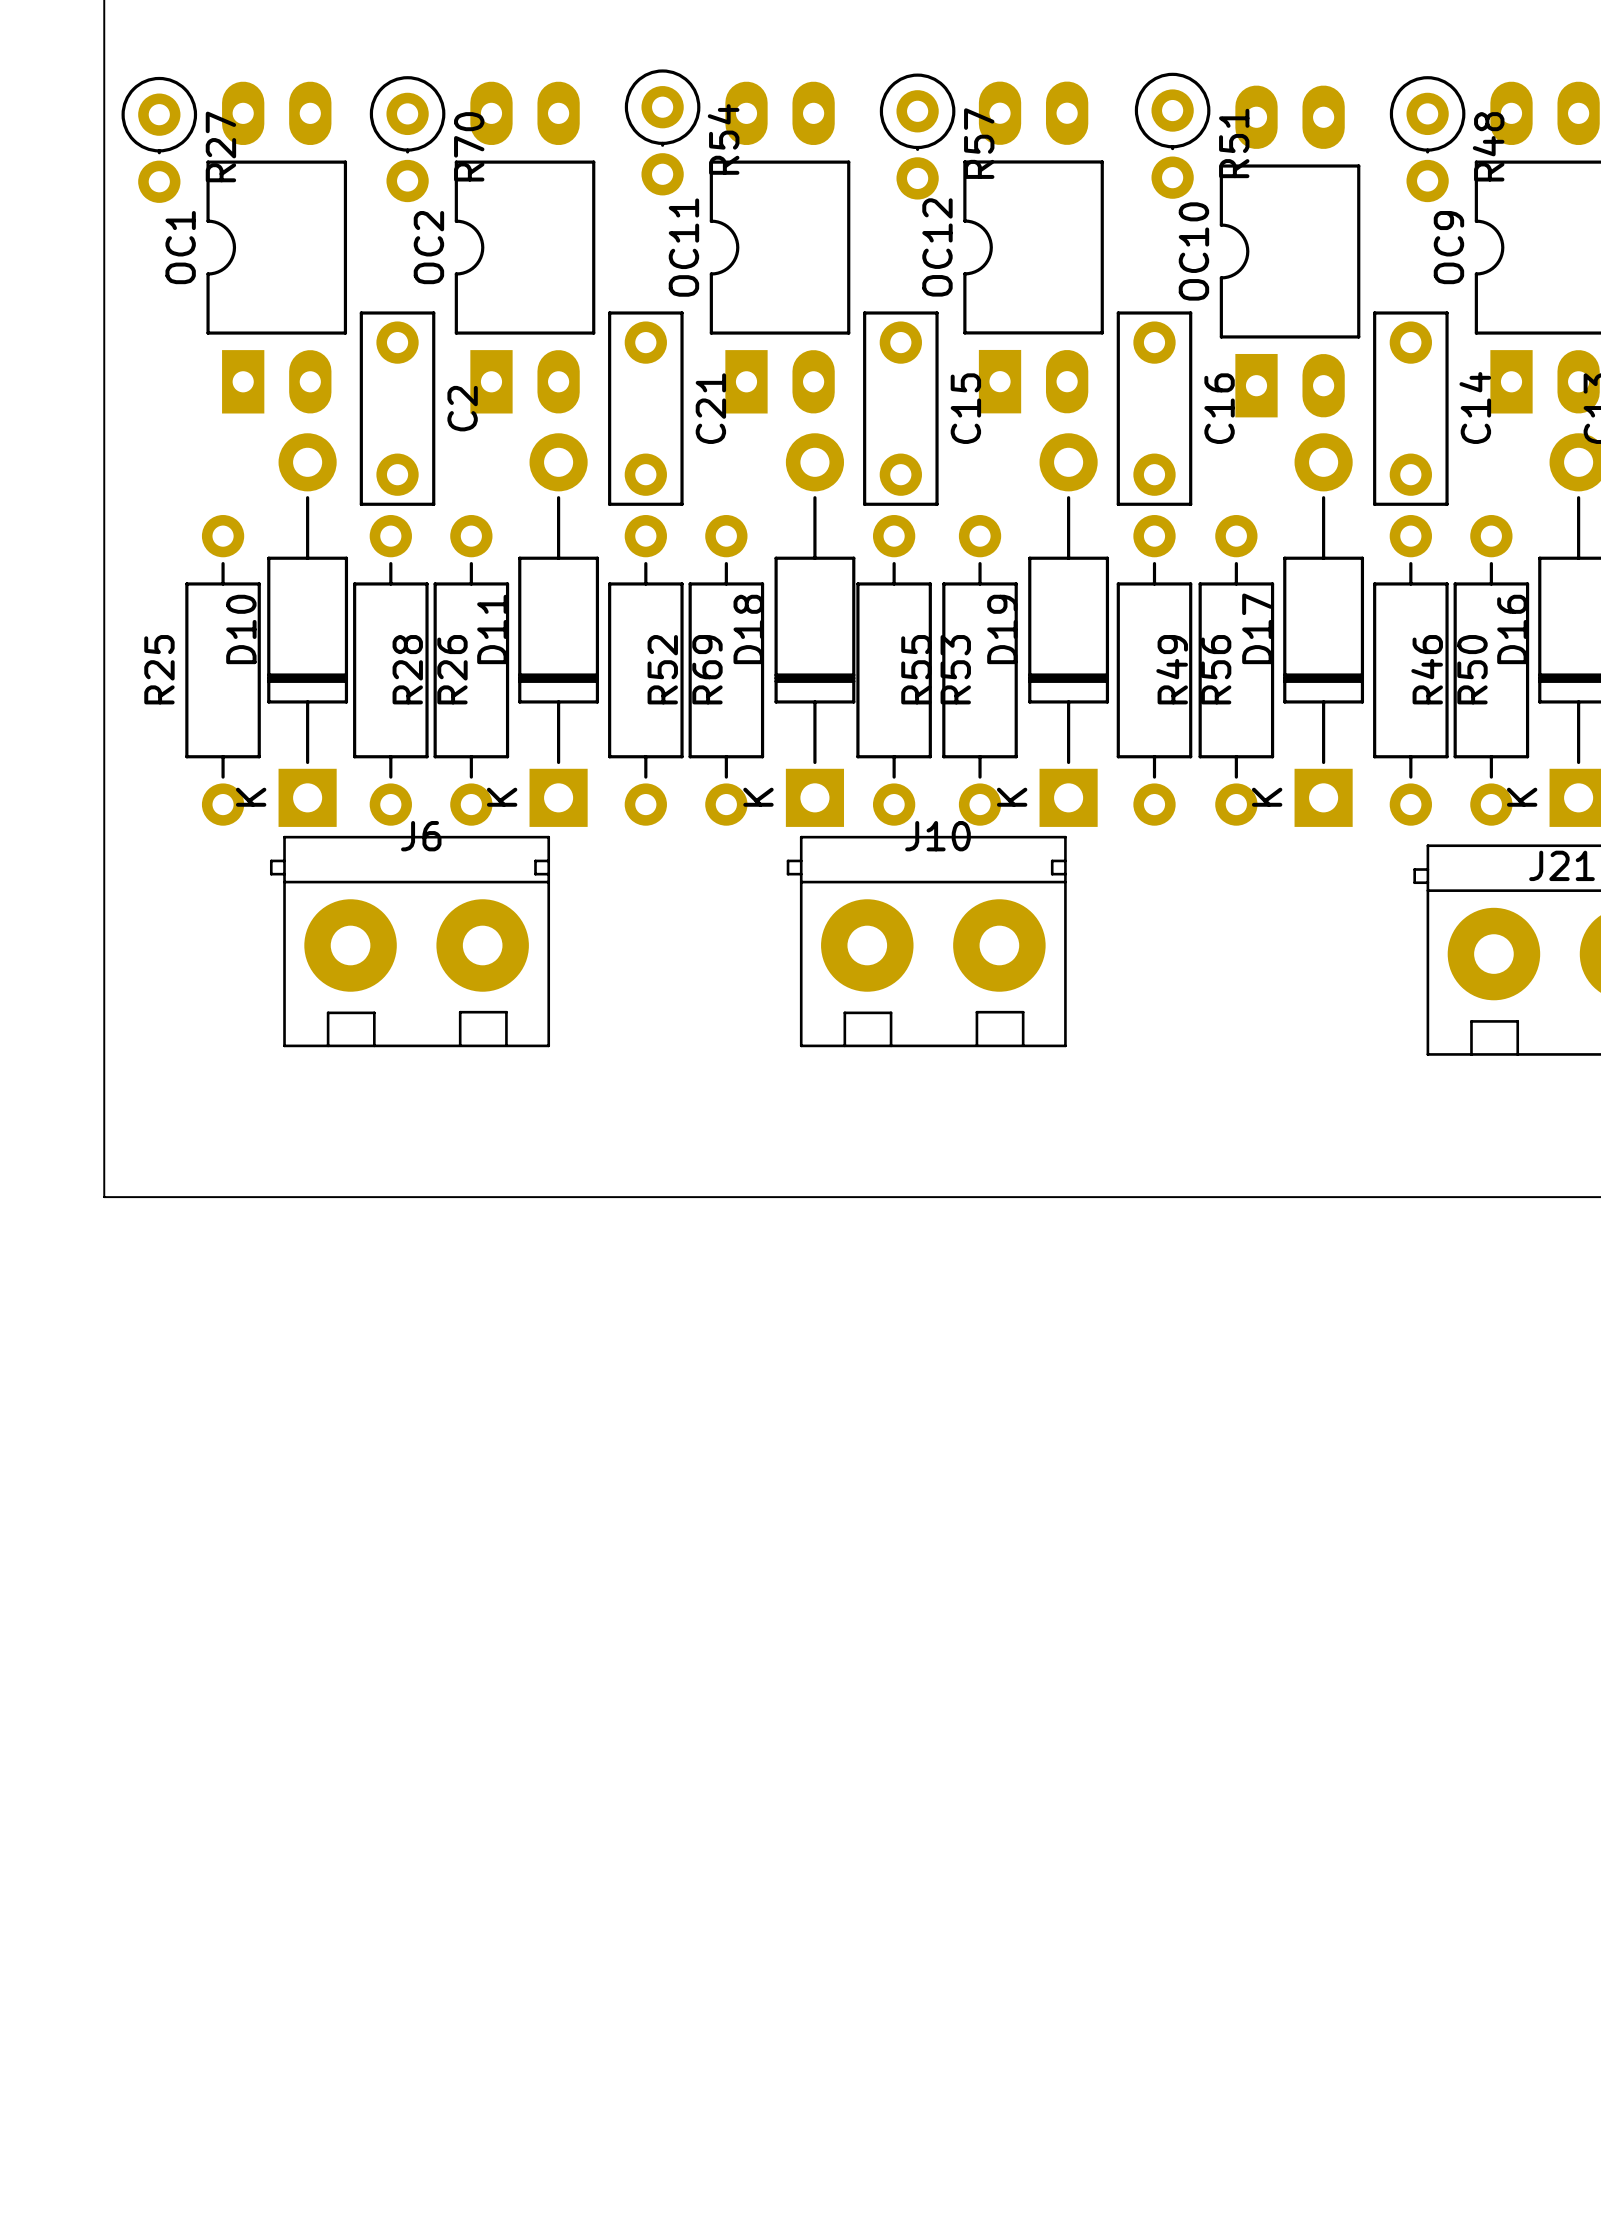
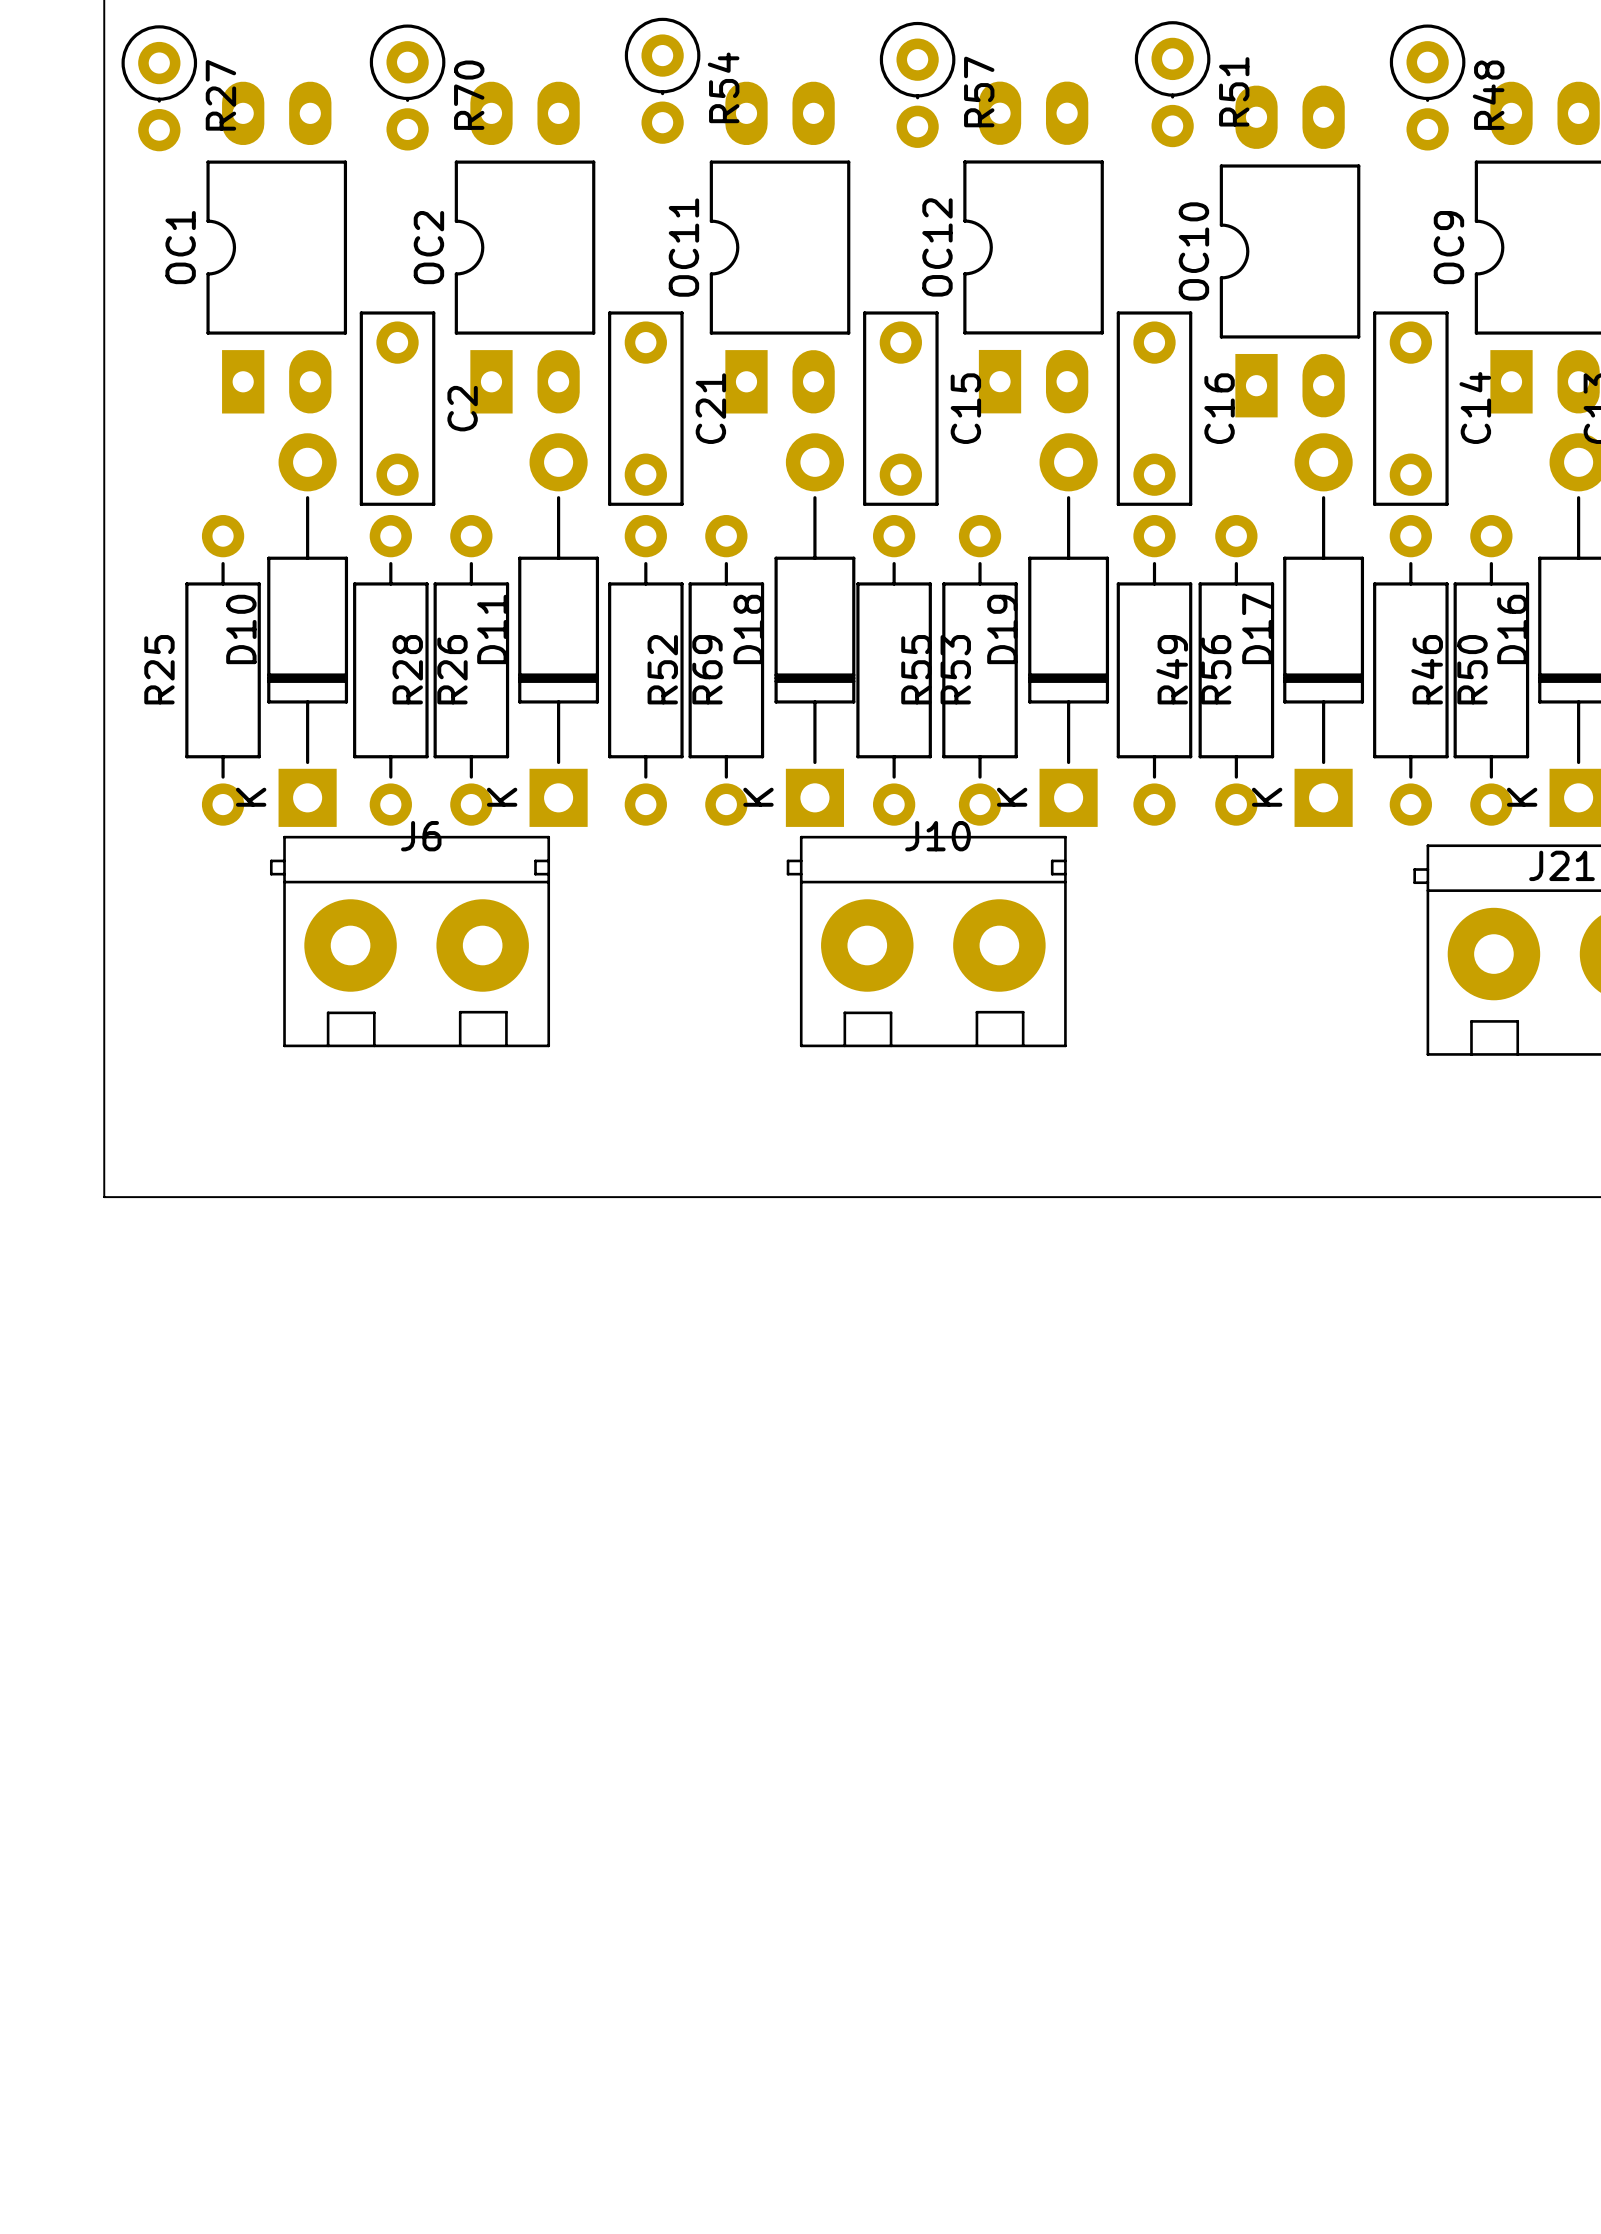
R54 position: (662, 132) -> (662, 80)
R51 position: (1172, 135) -> (1172, 84)
R57 position: (917, 136) -> (917, 84)
R27 position: (159, 139) -> (159, 88)
R70 position: (407, 139) -> (407, 87)
R48 position: (1427, 139) -> (1427, 87)

